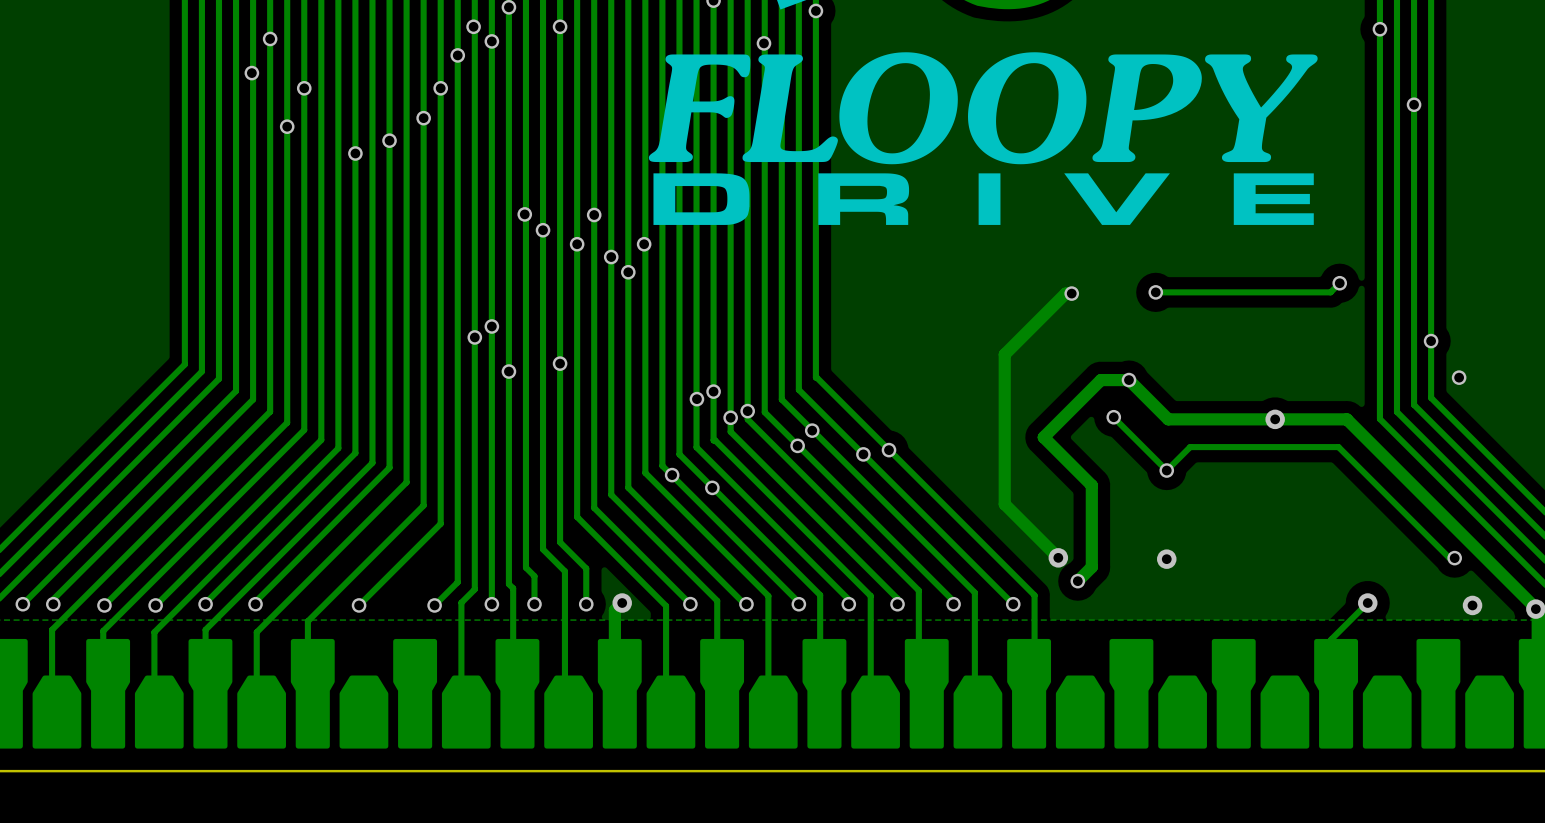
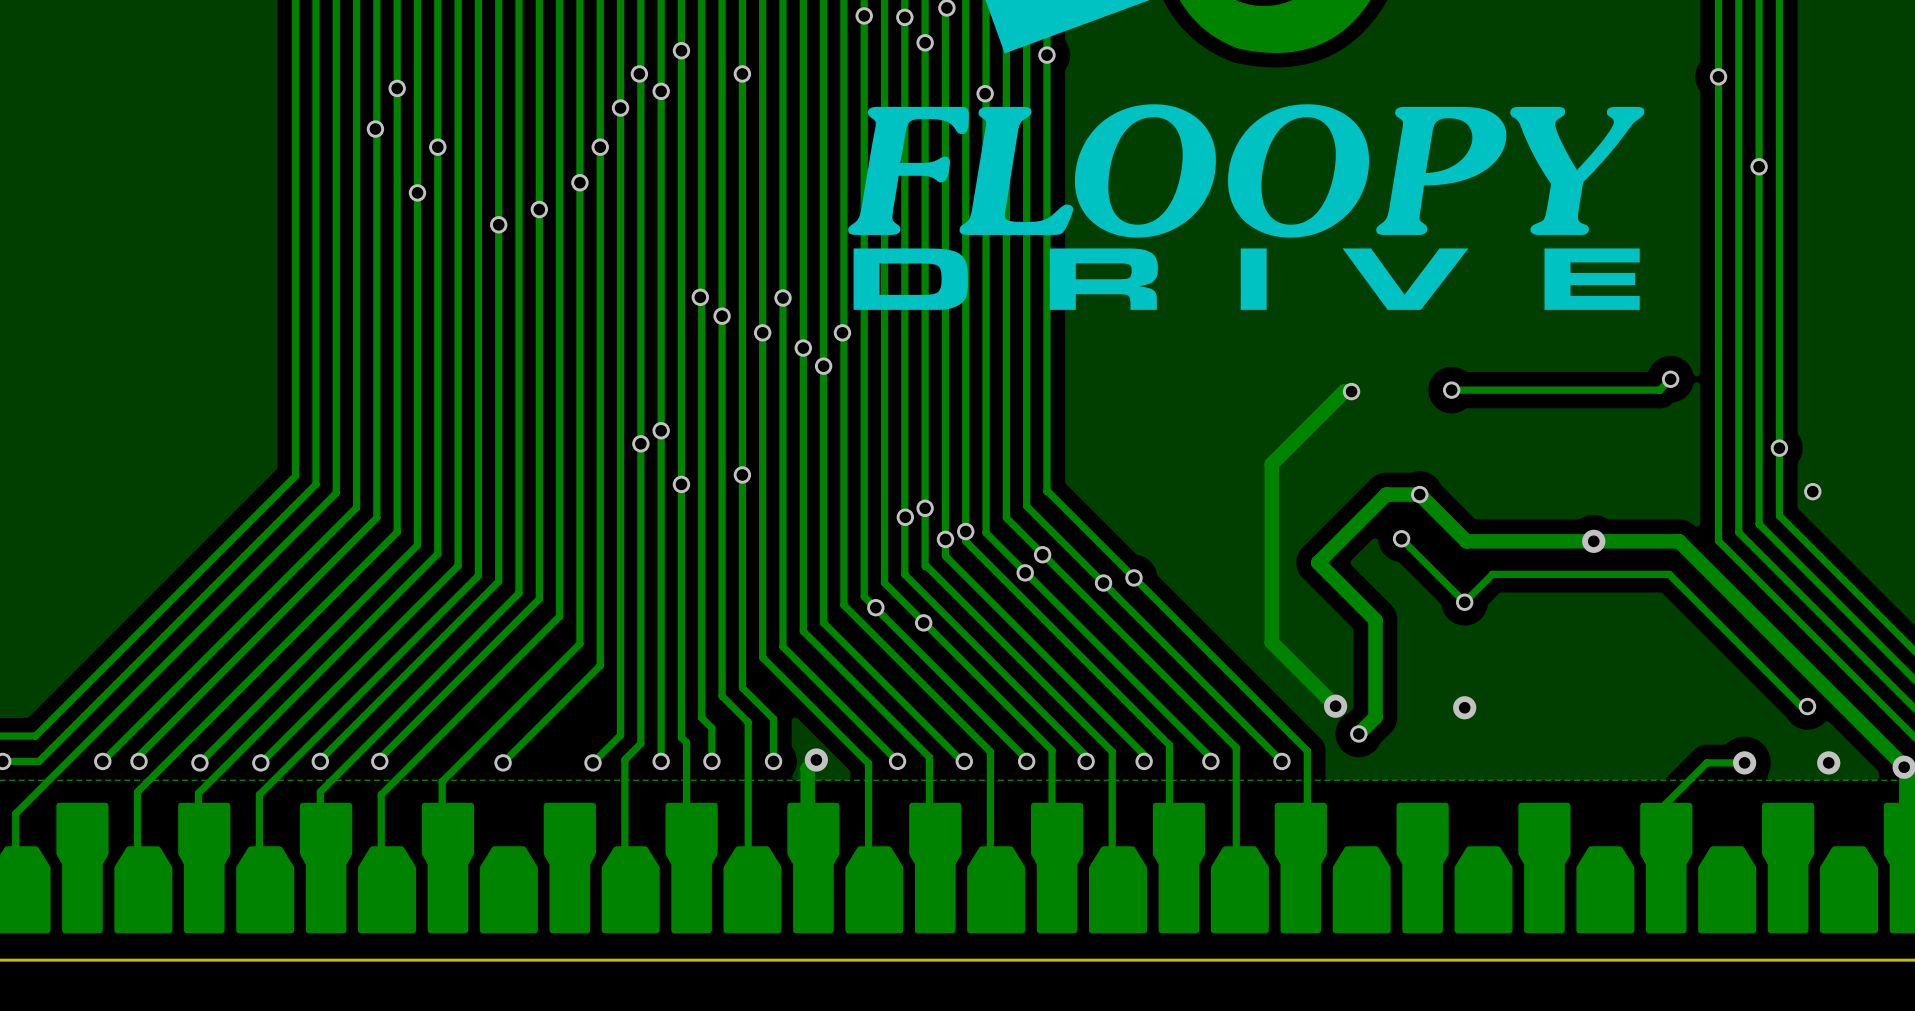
track: (1367, 603) (1331, 639) (1331, 644) -> (1744, 762) (1706, 762) (1660, 809)
via position: (1367, 603) -> (1744, 762)

